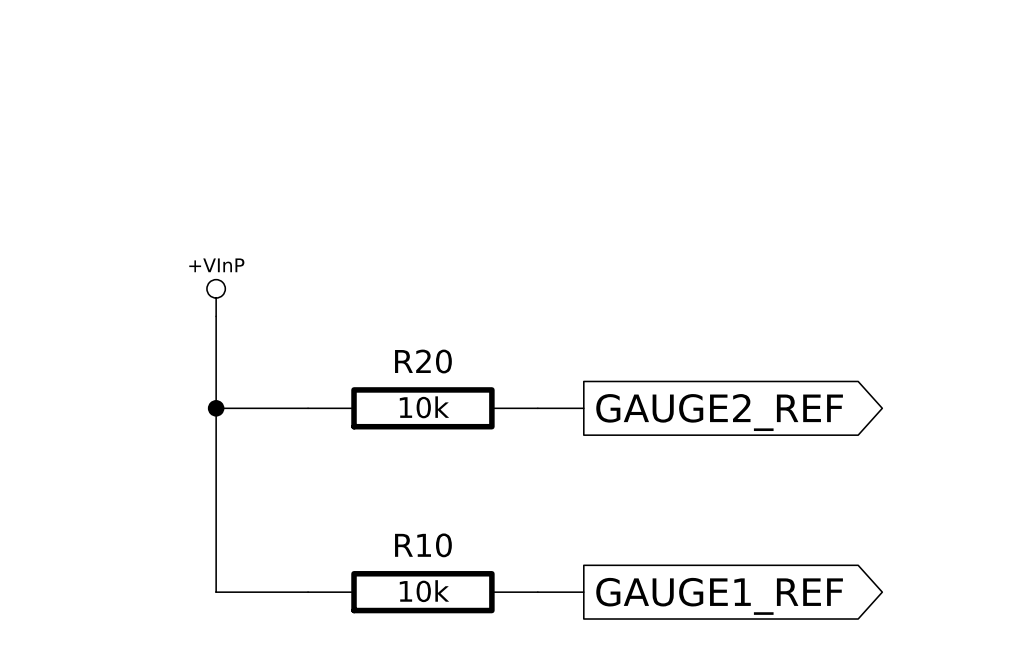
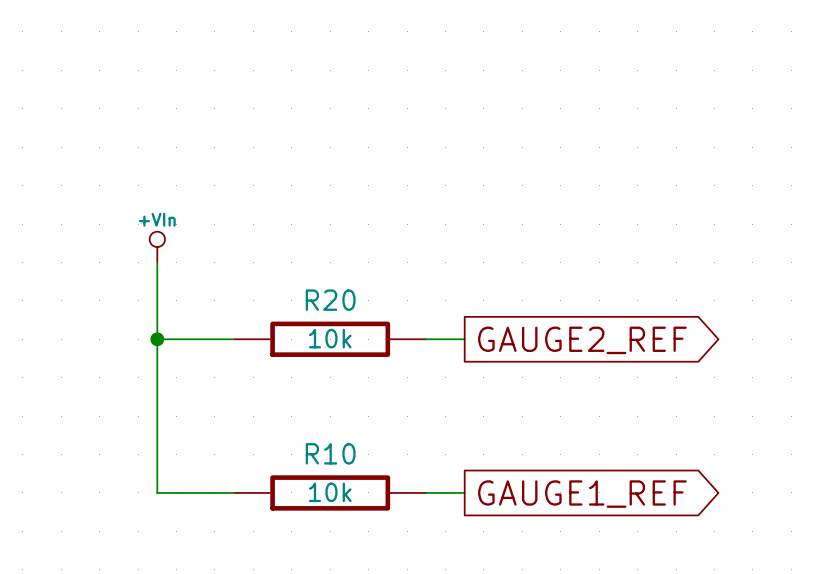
power symbol: +VInP (216, 298) -> +VIn (157, 247)

